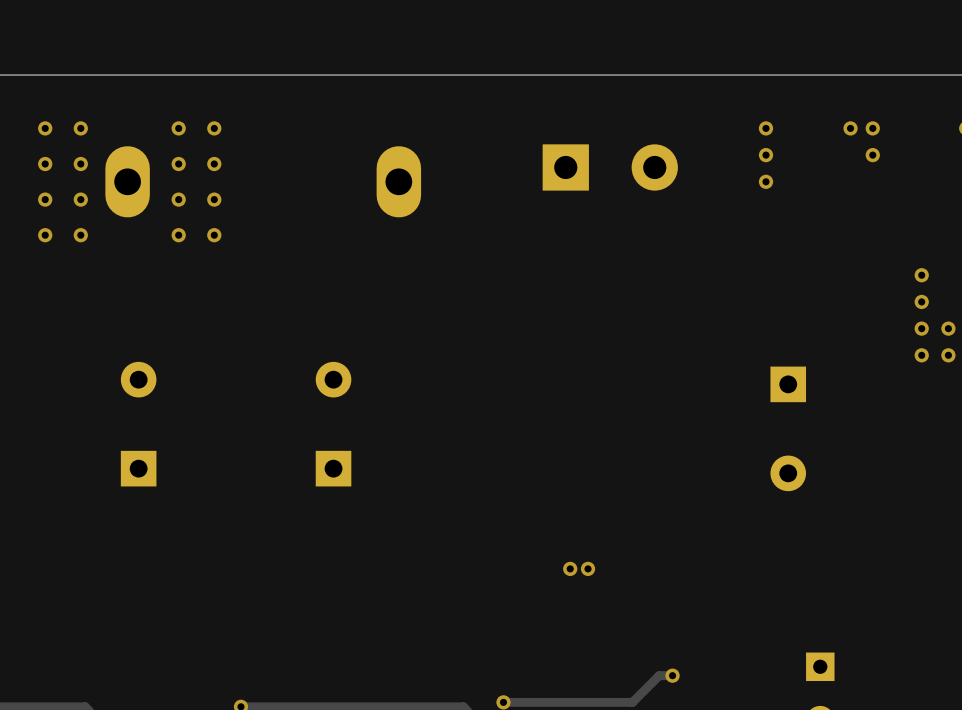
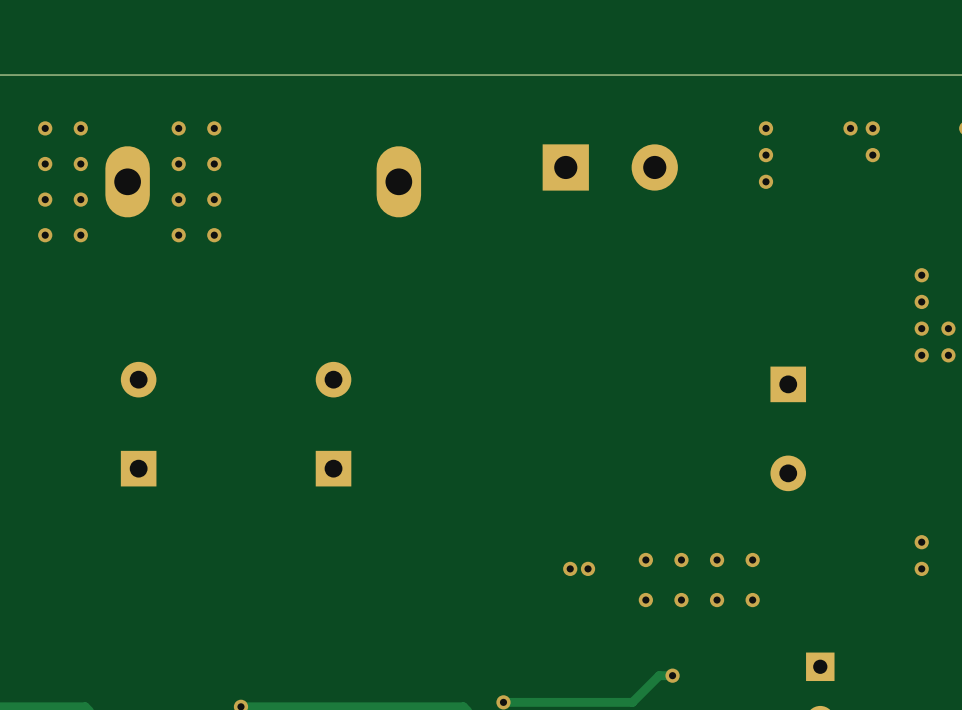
via: none -> (921, 542)
via: none -> (645, 559)
via: none -> (681, 559)
via: none -> (717, 559)
via: none -> (752, 559)
via: none -> (921, 568)
via: none -> (645, 600)
via: none -> (681, 600)
via: none -> (717, 600)
via: none -> (752, 600)

